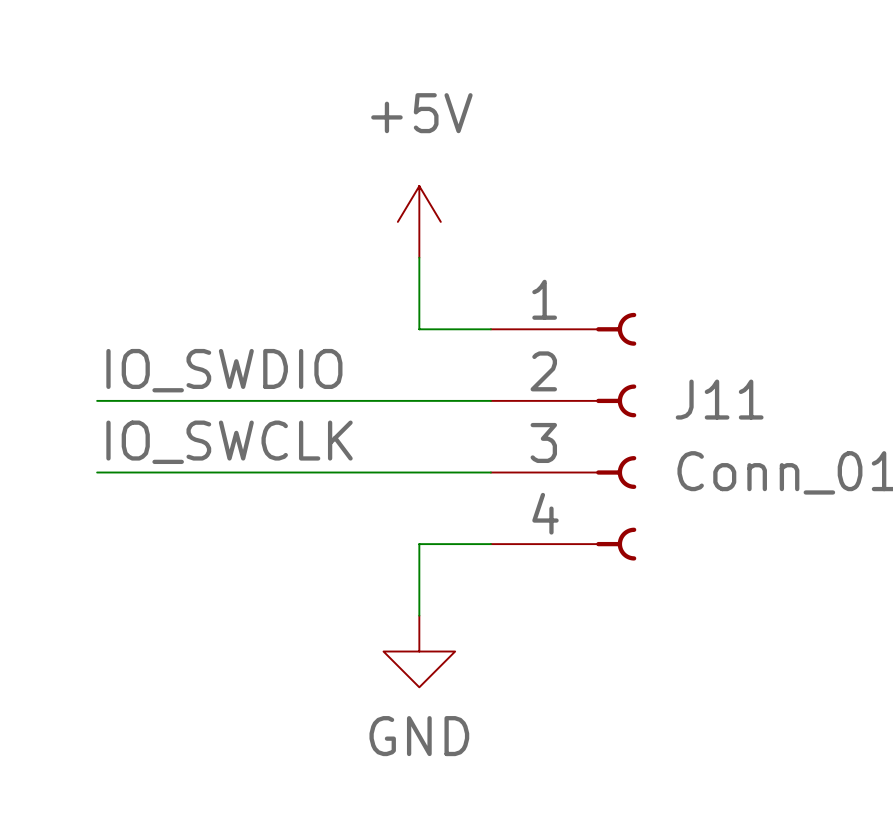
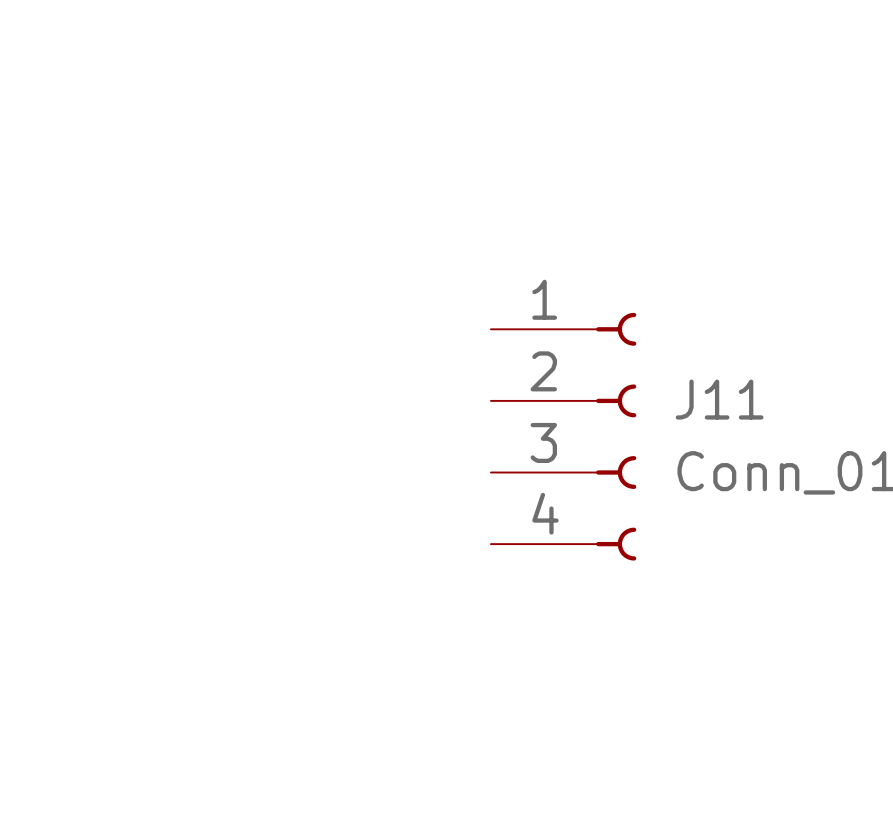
power symbol: +5V (419, 221) -> none
wire: (419, 257) (419, 329) (490, 329) -> none
label: IO_SWDIO (224, 370) -> none
wire: (97, 400) (490, 400) -> none
label: IO_SWCLK (229, 442) -> none
wire: (97, 472) (490, 472) -> none
wire: (490, 544) (419, 544) (419, 615) -> none
power symbol: GND (419, 651) -> none

